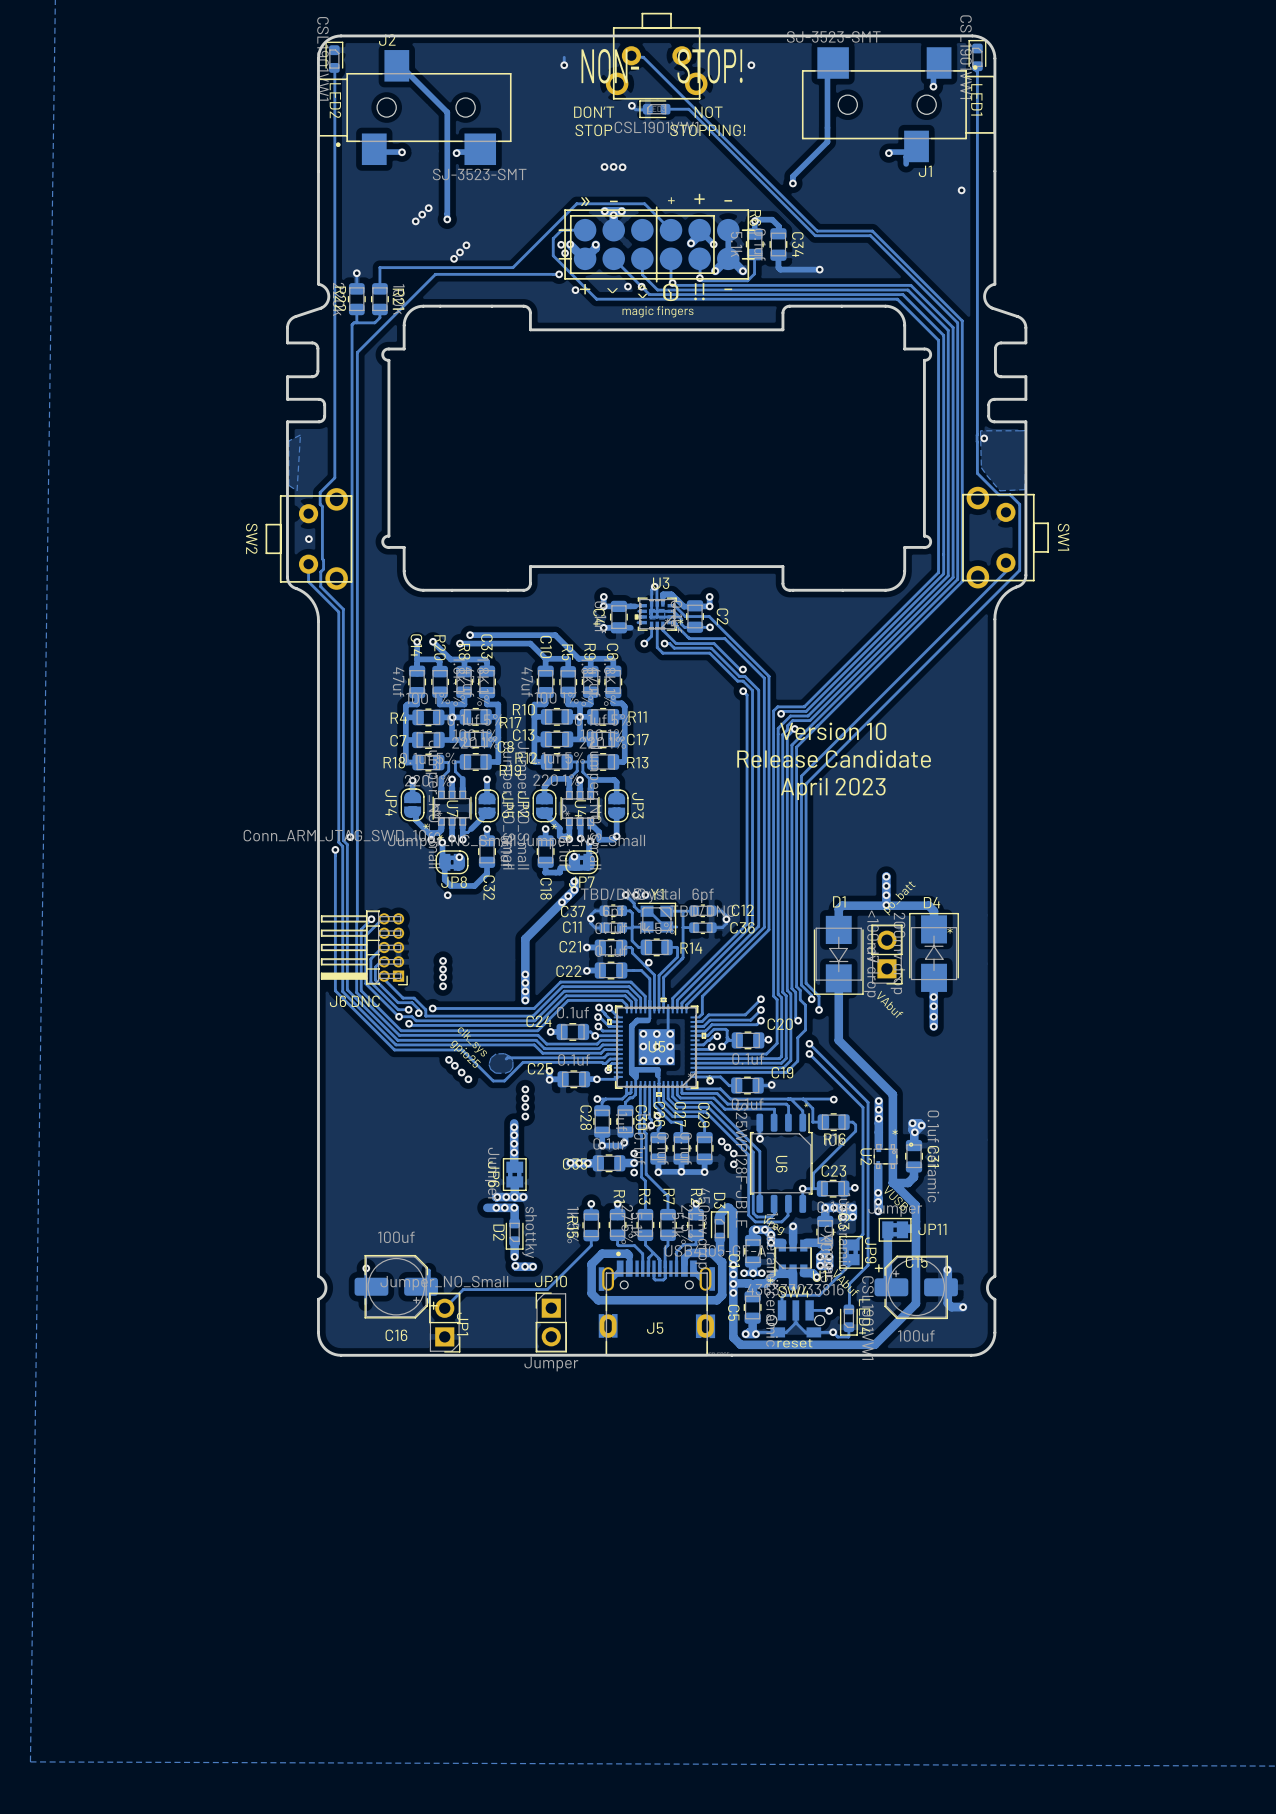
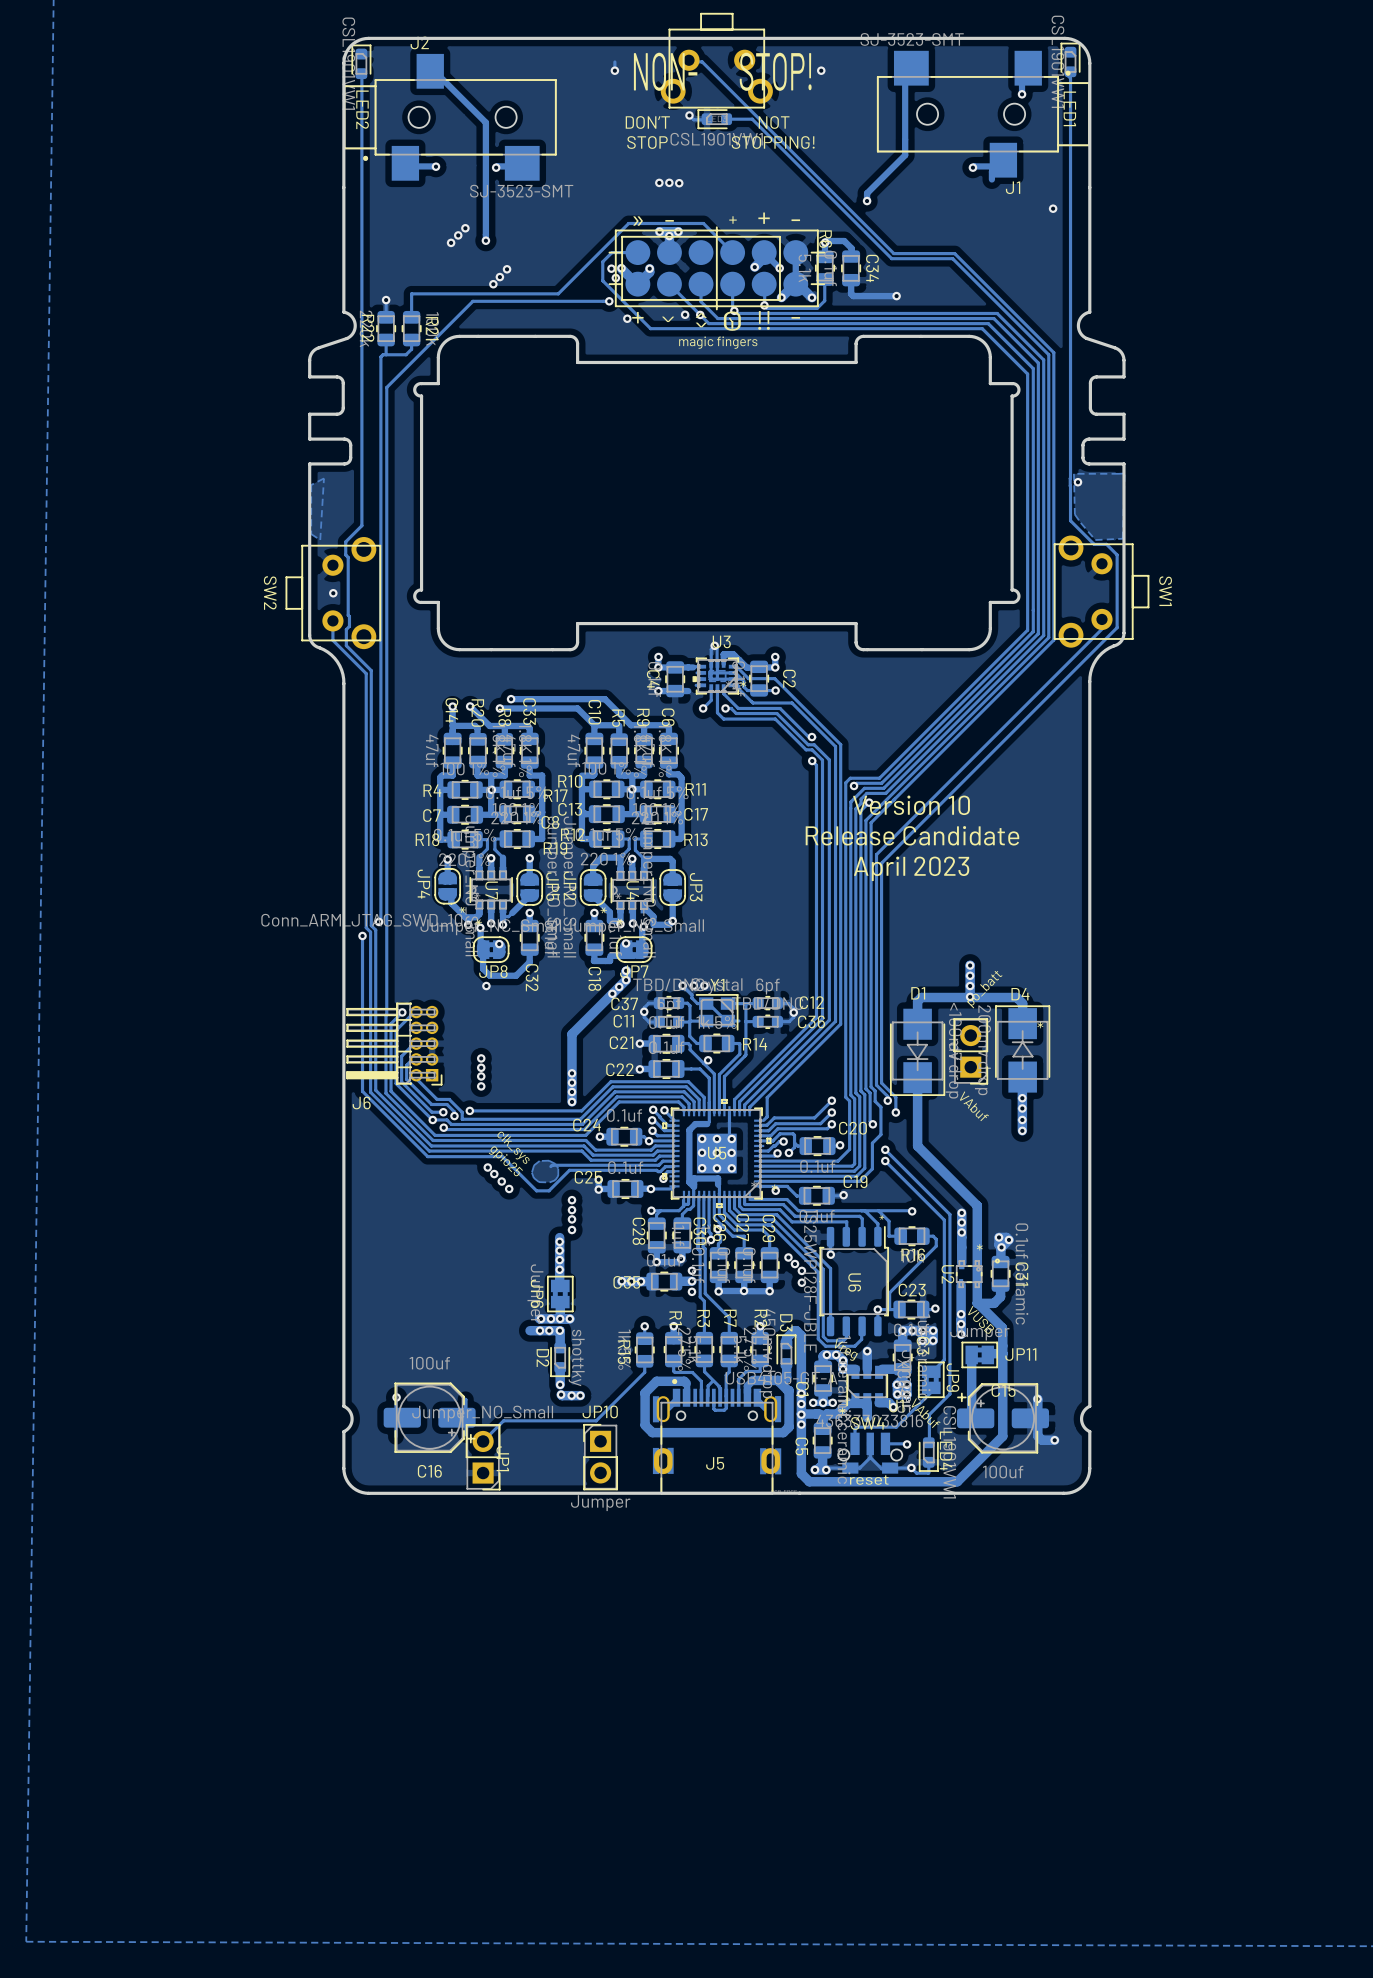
J6 DNC name: J6 DNC (354, 1001) -> J6 (361, 1102)

